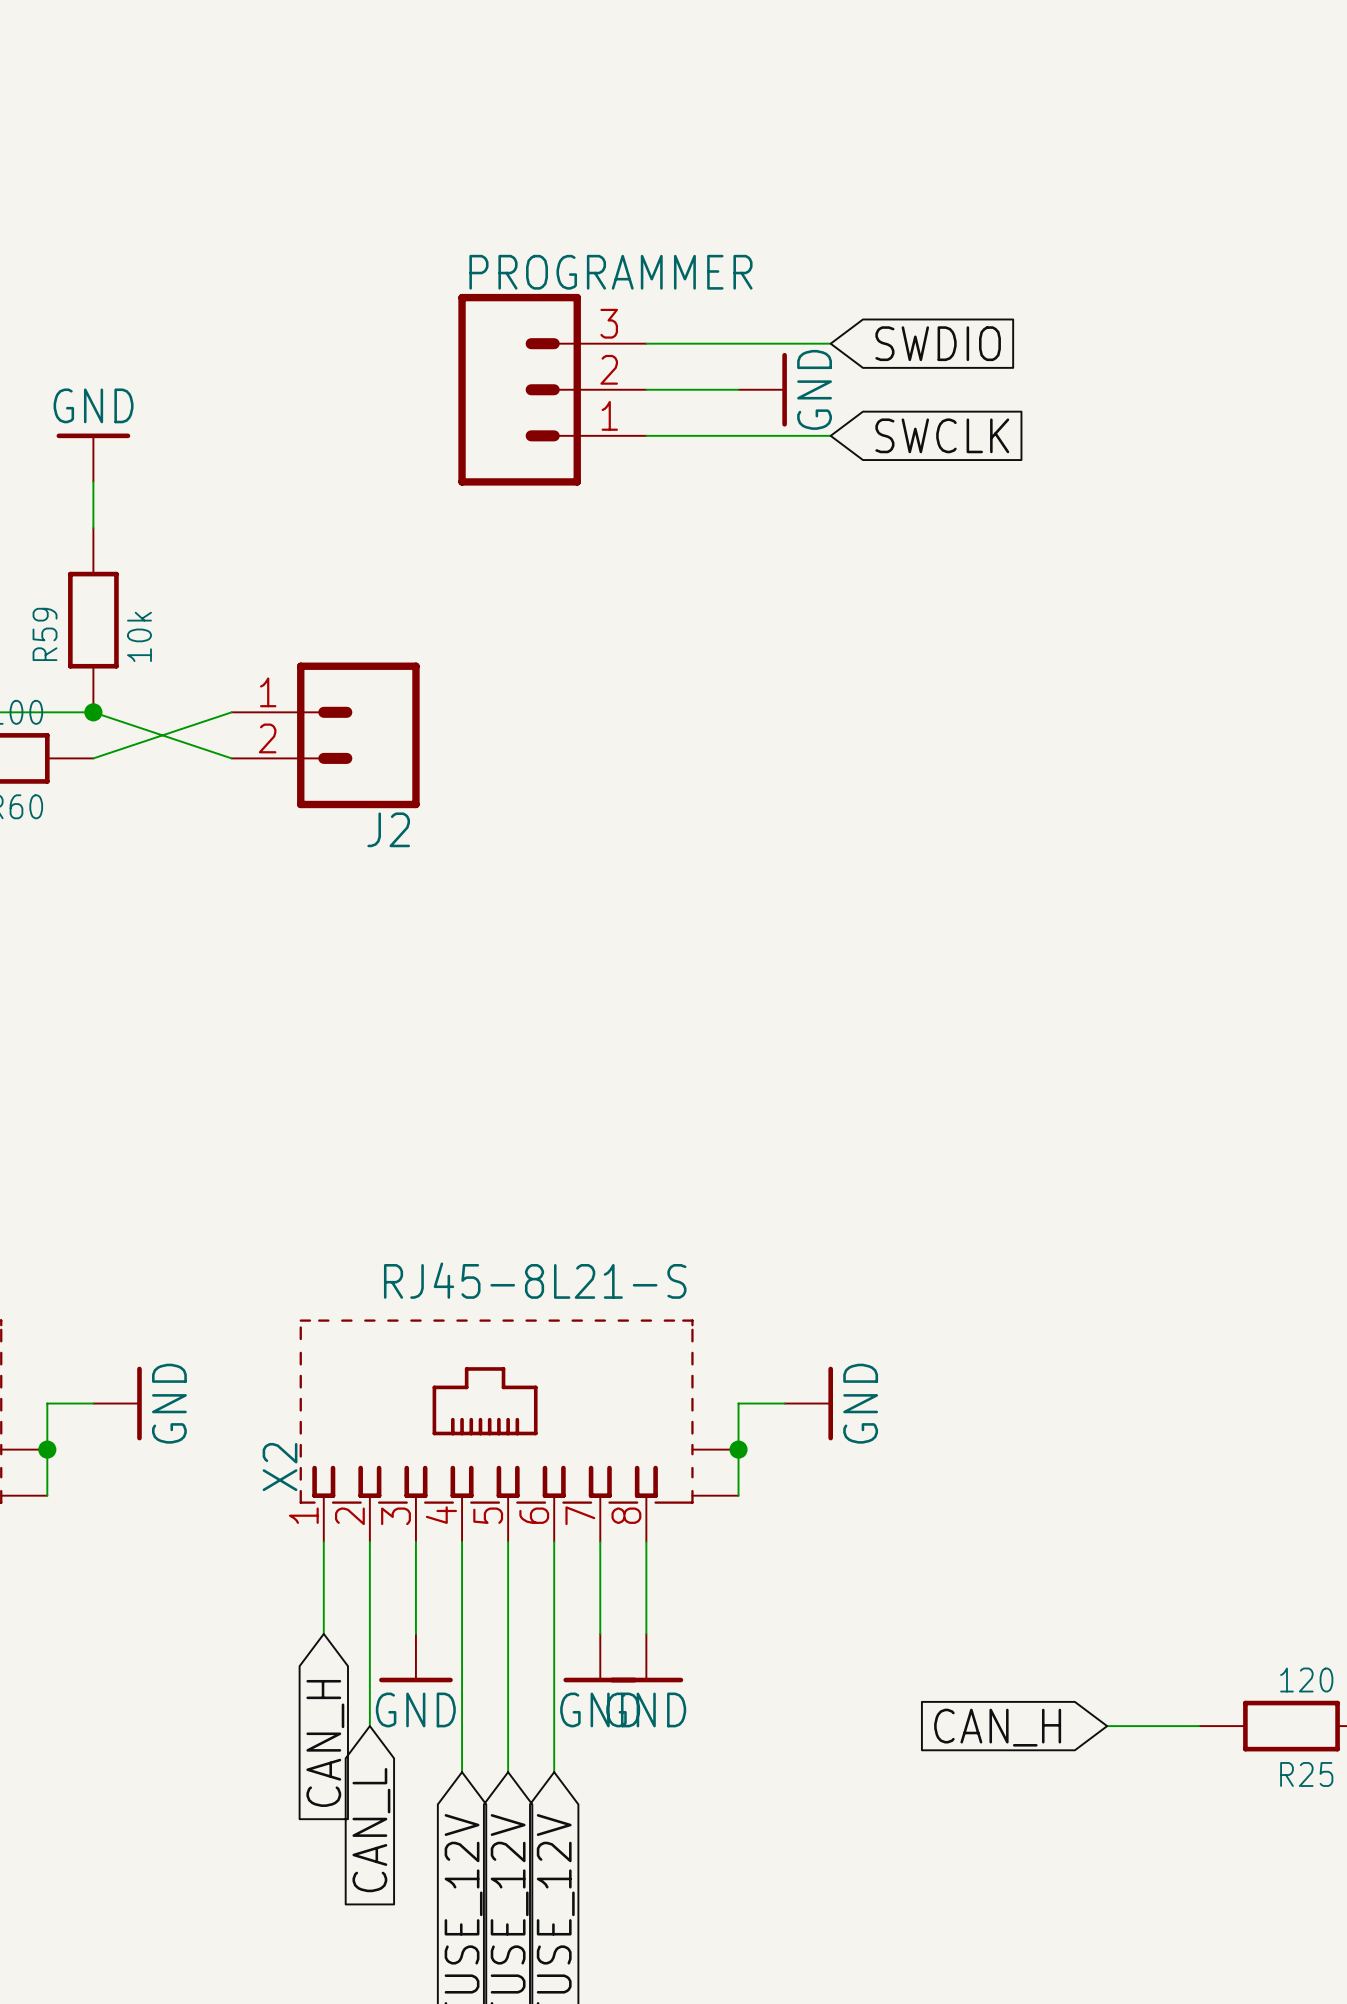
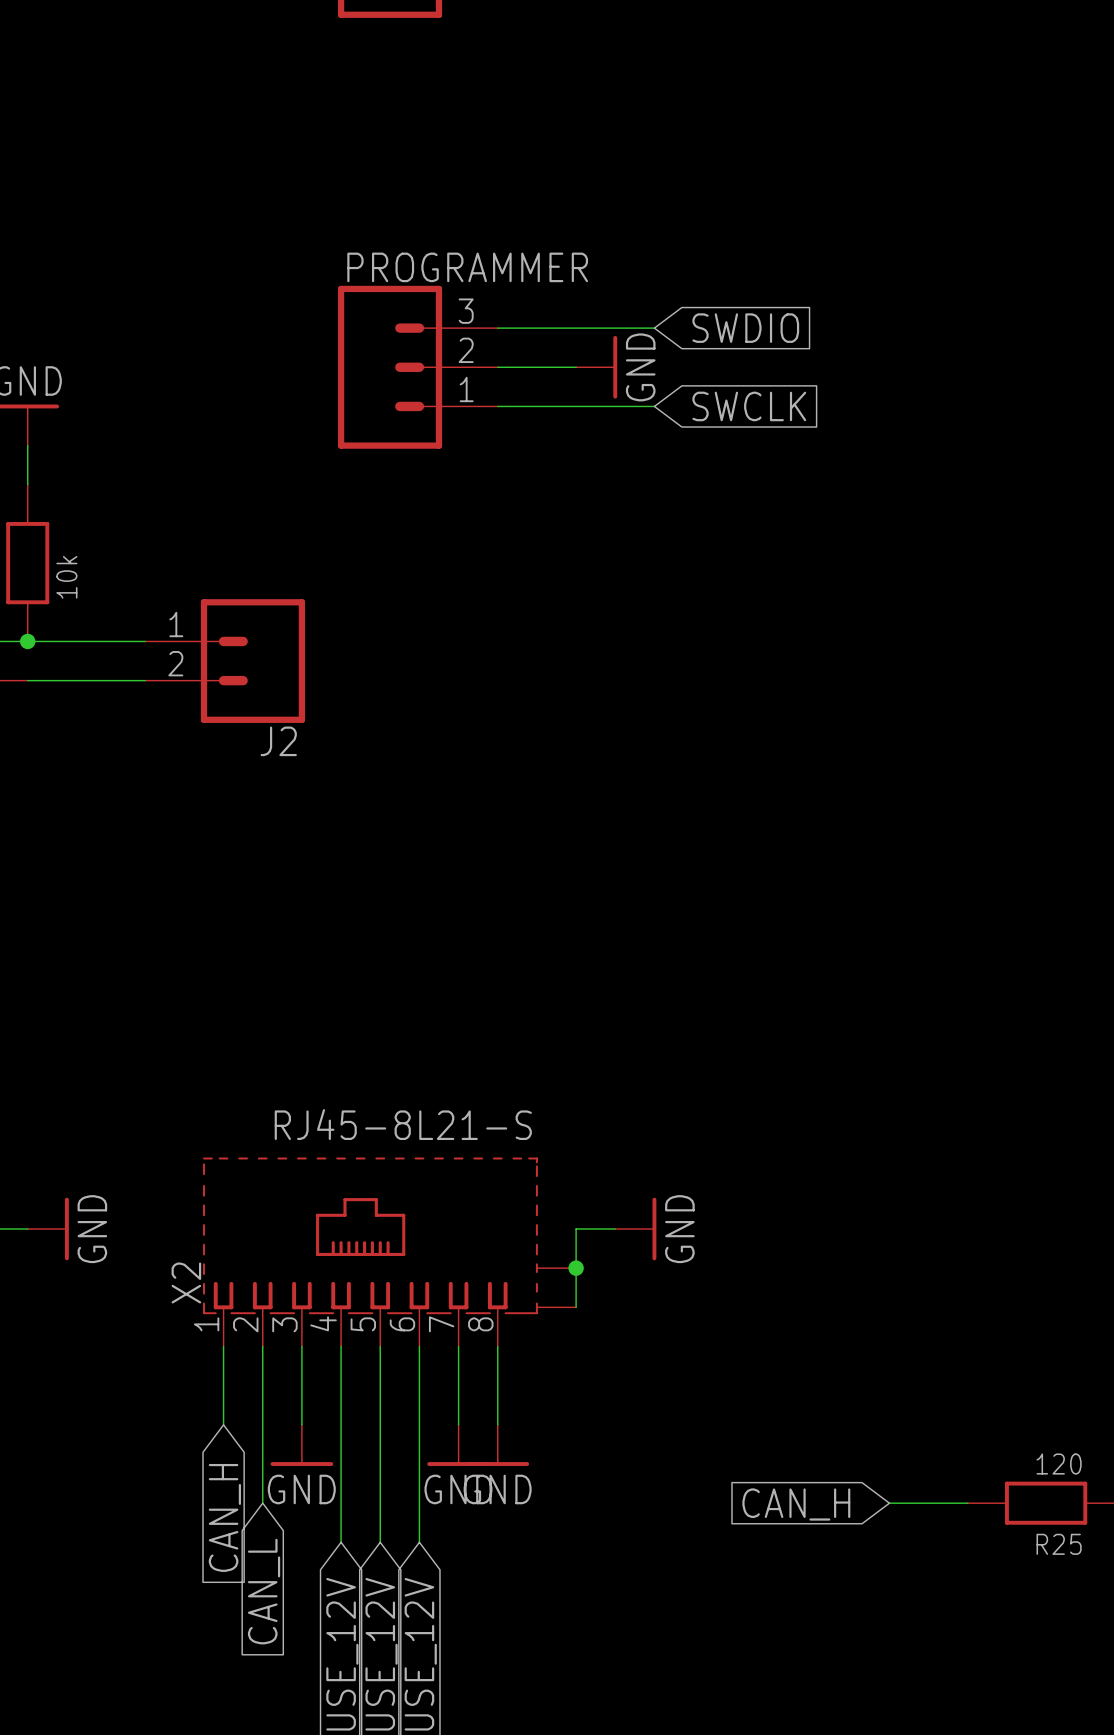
wire: (93, 712) (231, 758) -> (27, 641) (145, 641)
wire: (231, 712) (93, 758) -> (145, 680) (27, 680)

